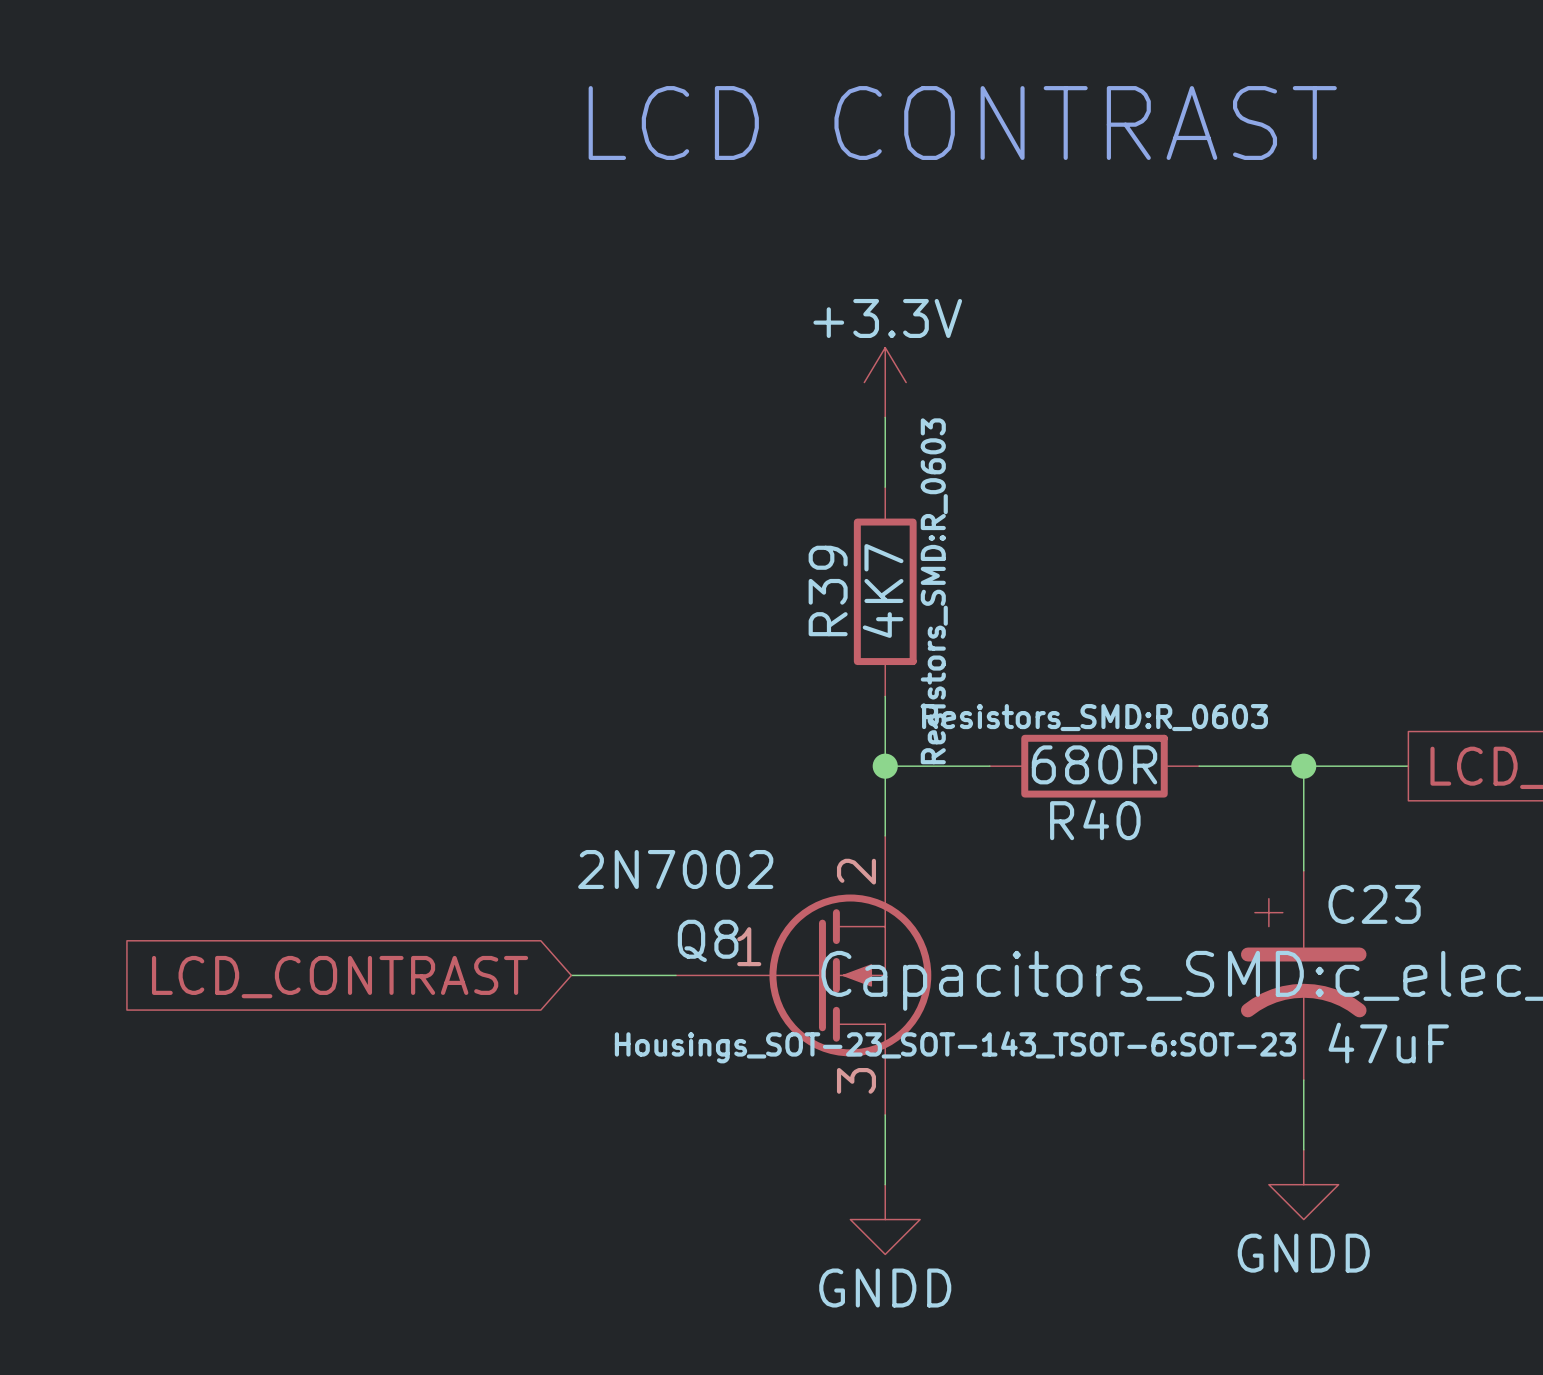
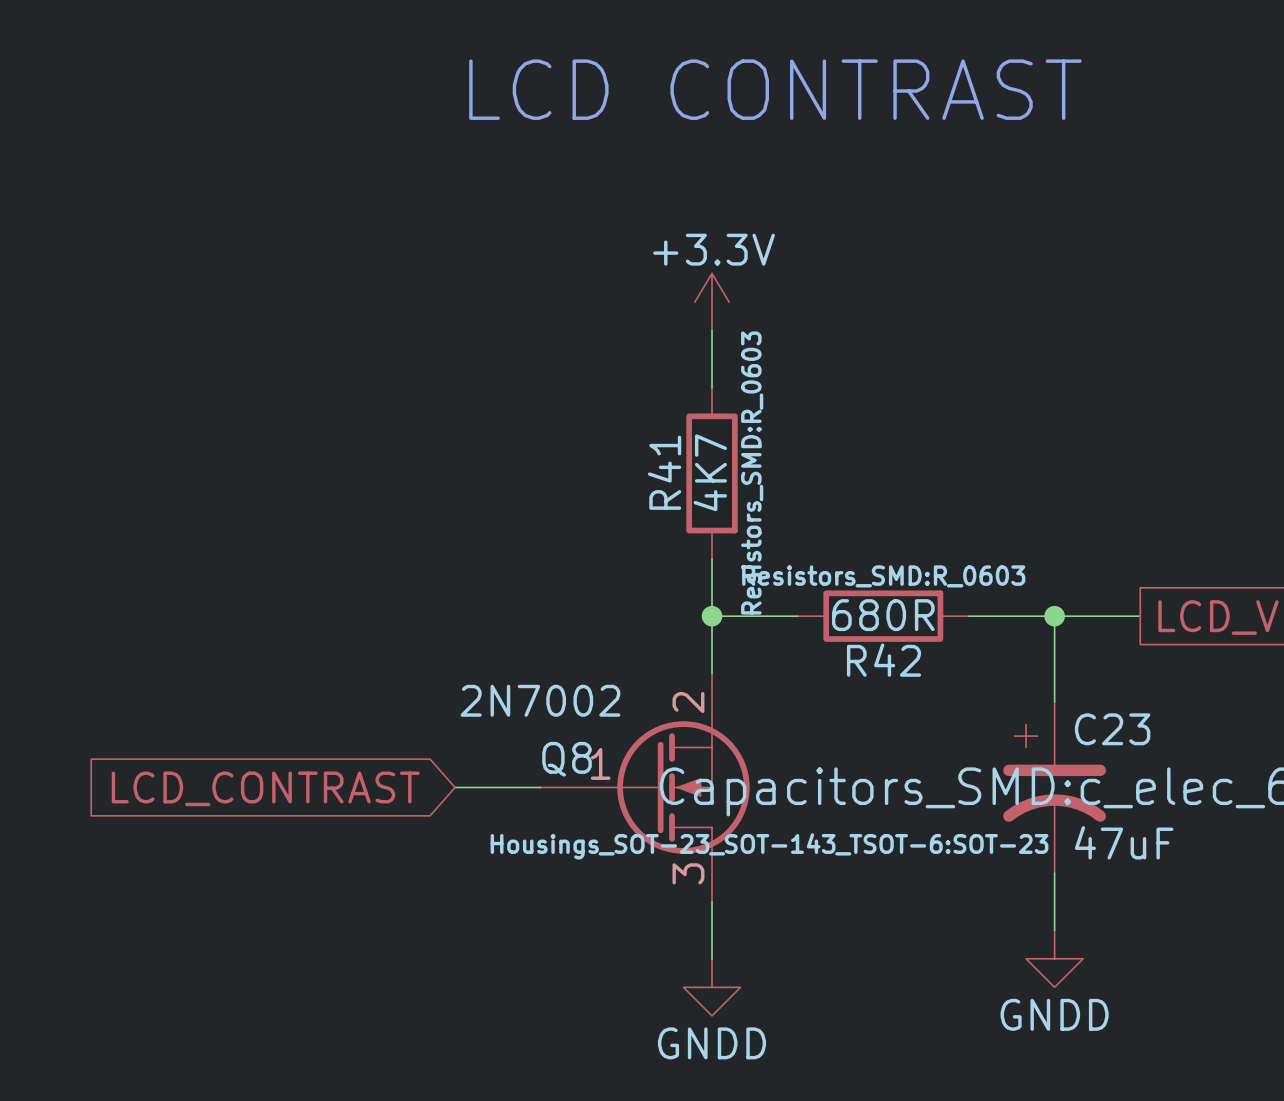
R39 name: R39 (828, 590) -> R41 (664, 472)
R40 name: R40 (1095, 819) -> R42 (883, 660)

